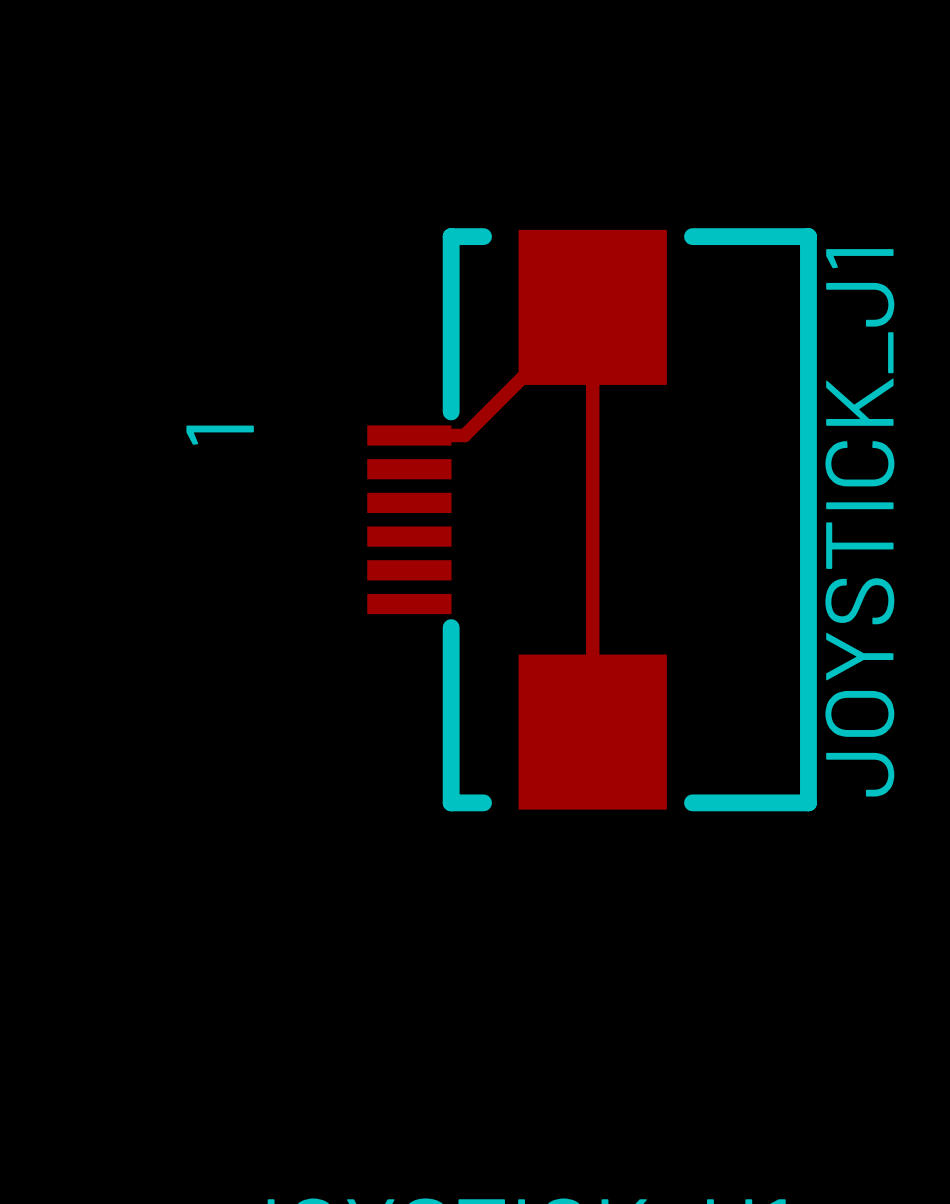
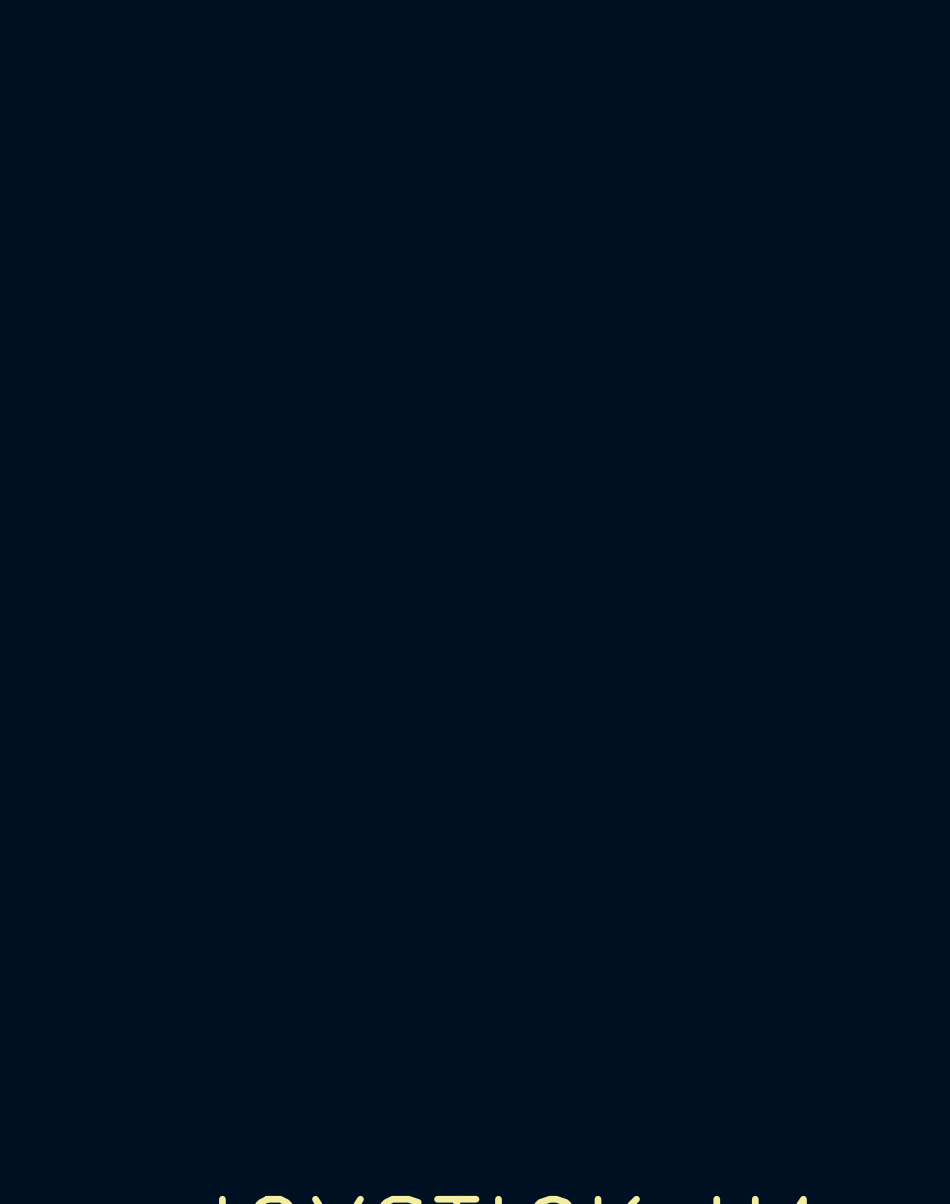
track: (409, 435) (464, 435) (592, 307) (592, 732) -> none
JOYSTICK_J1: (592, 519) -> none

